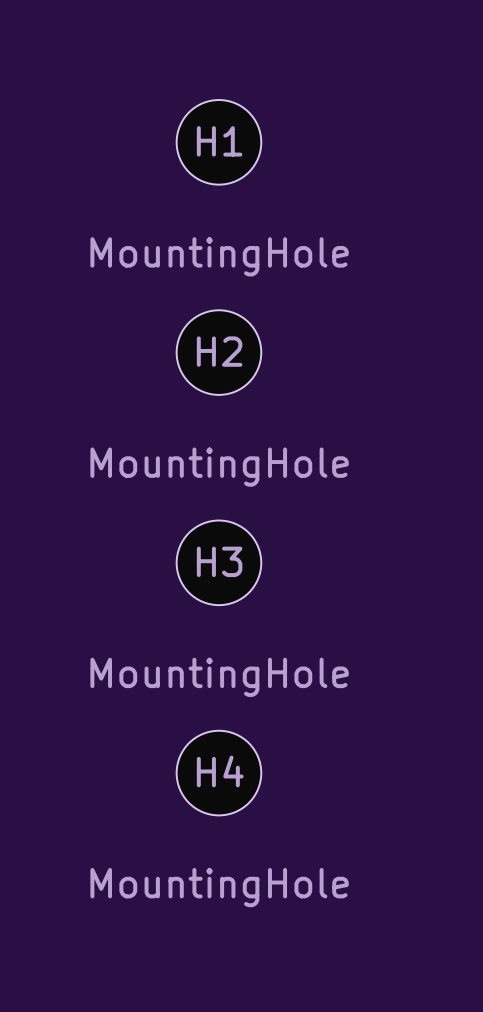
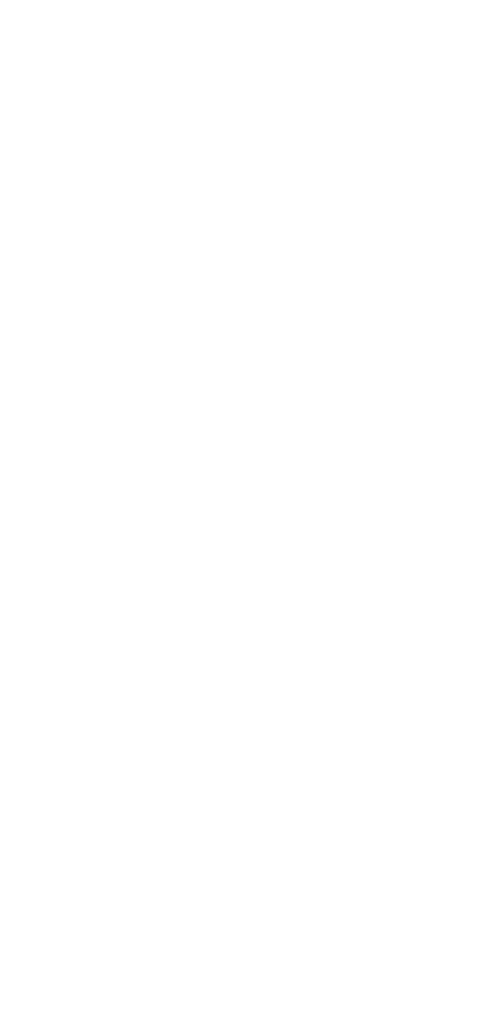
H1: MountingHole (218, 142) -> none
H2: MountingHole (218, 352) -> none
H3: MountingHole (218, 562) -> none
H4: MountingHole (218, 773) -> none

